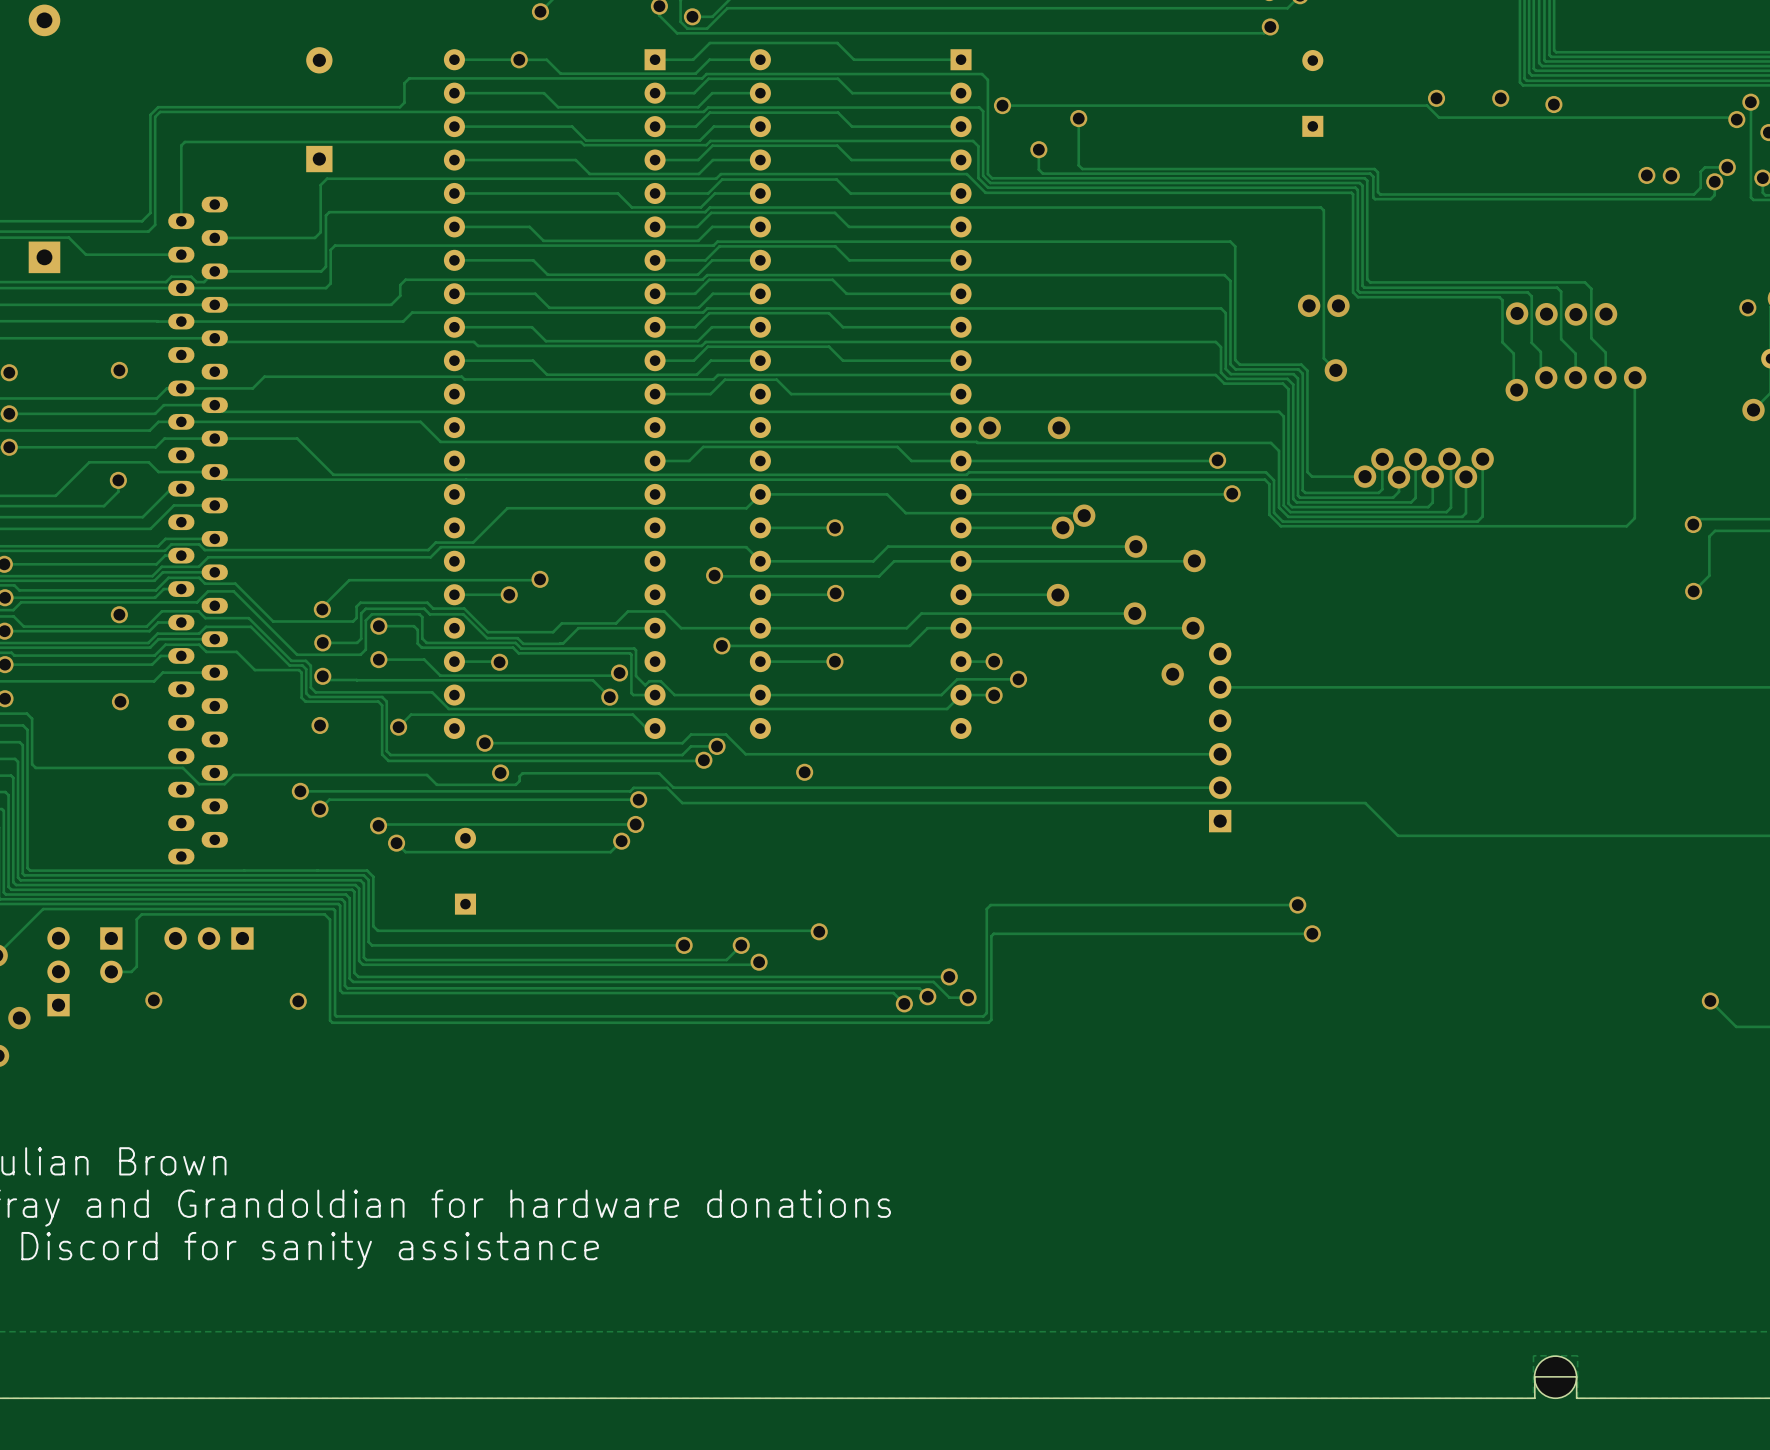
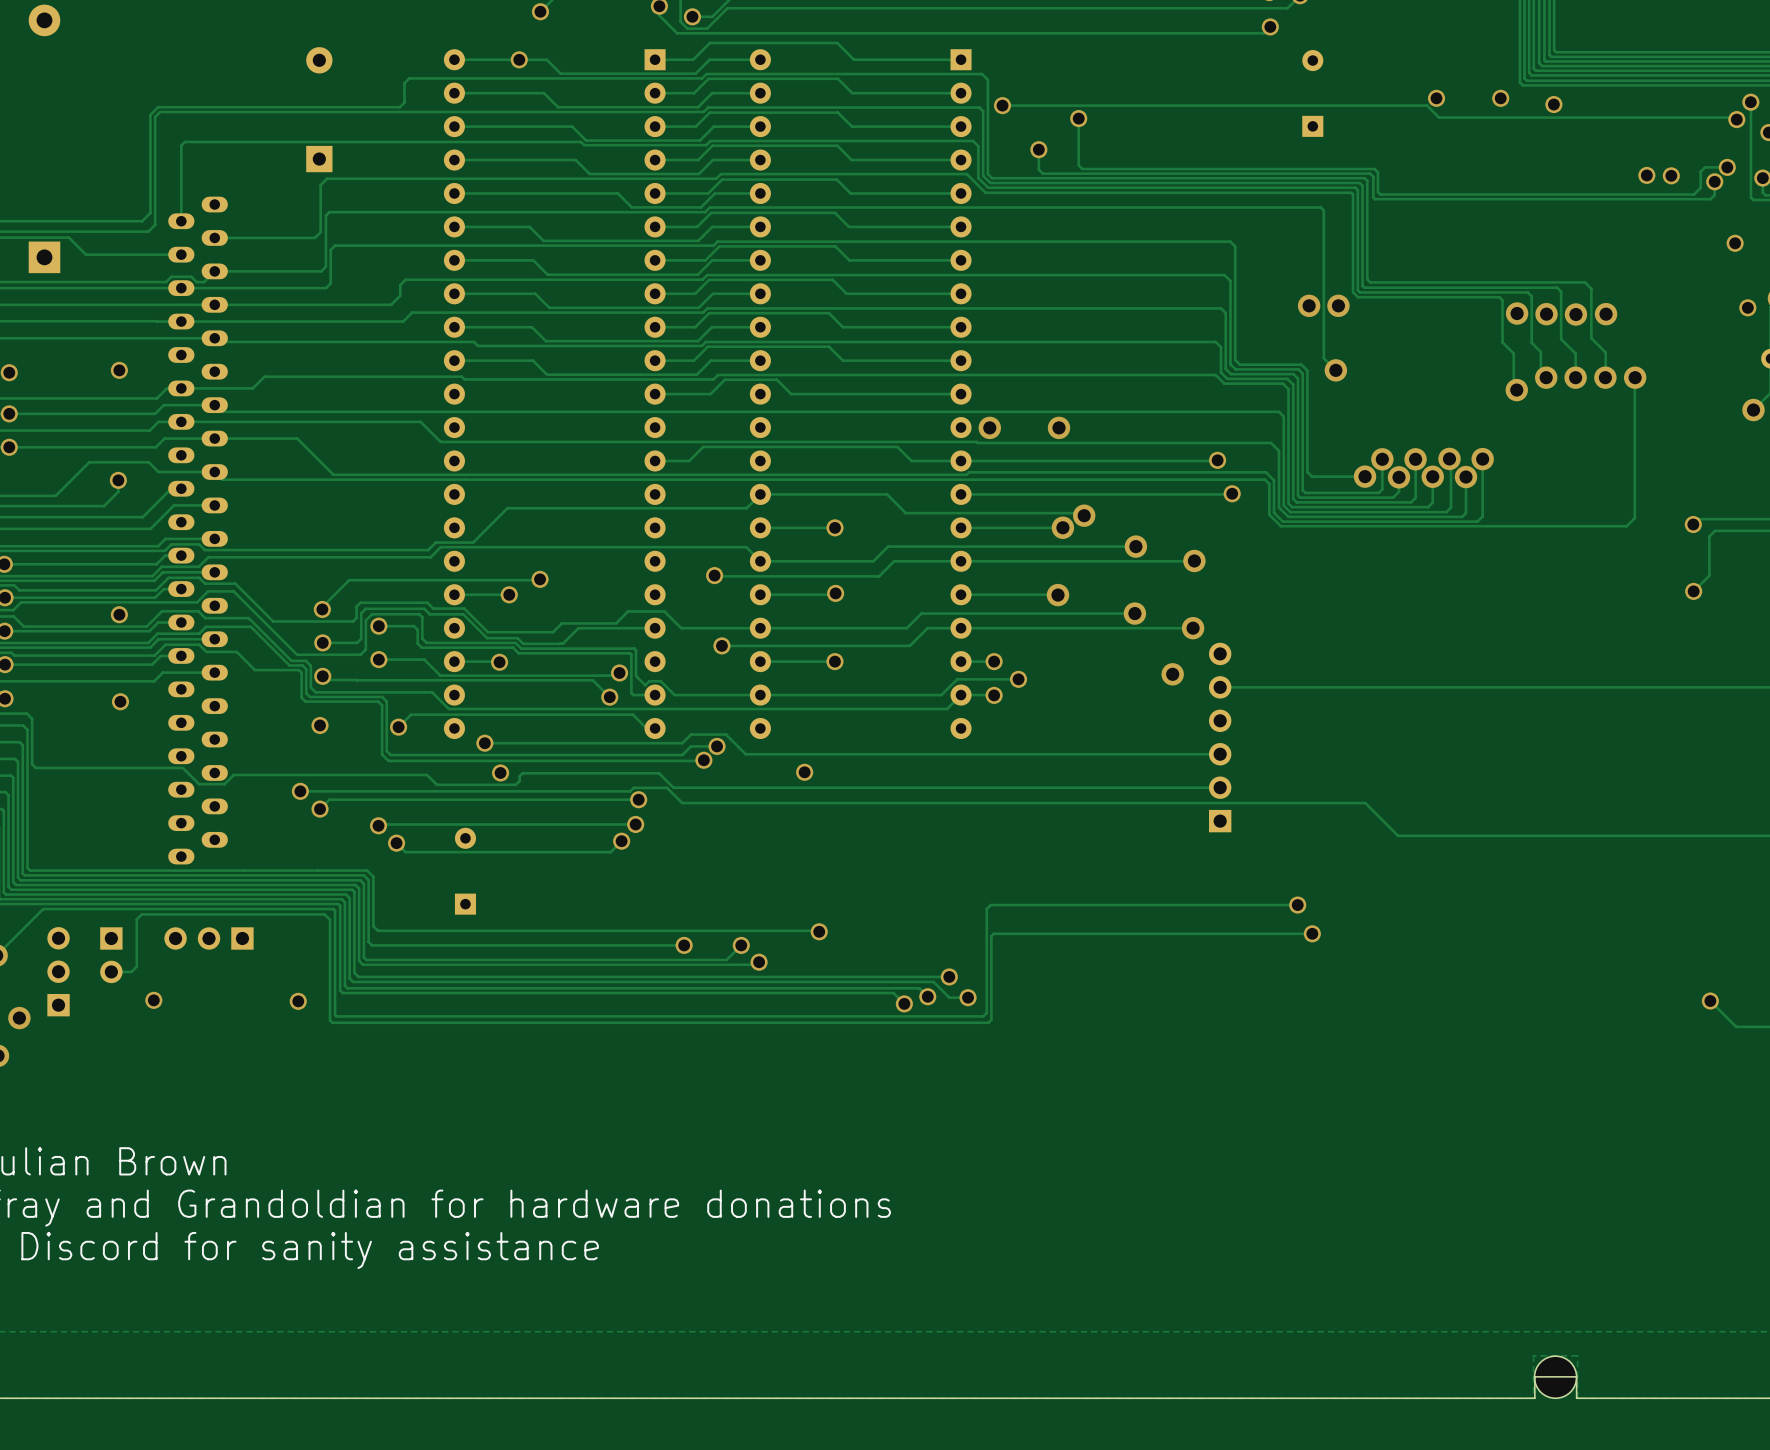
via: none -> (1735, 243)

